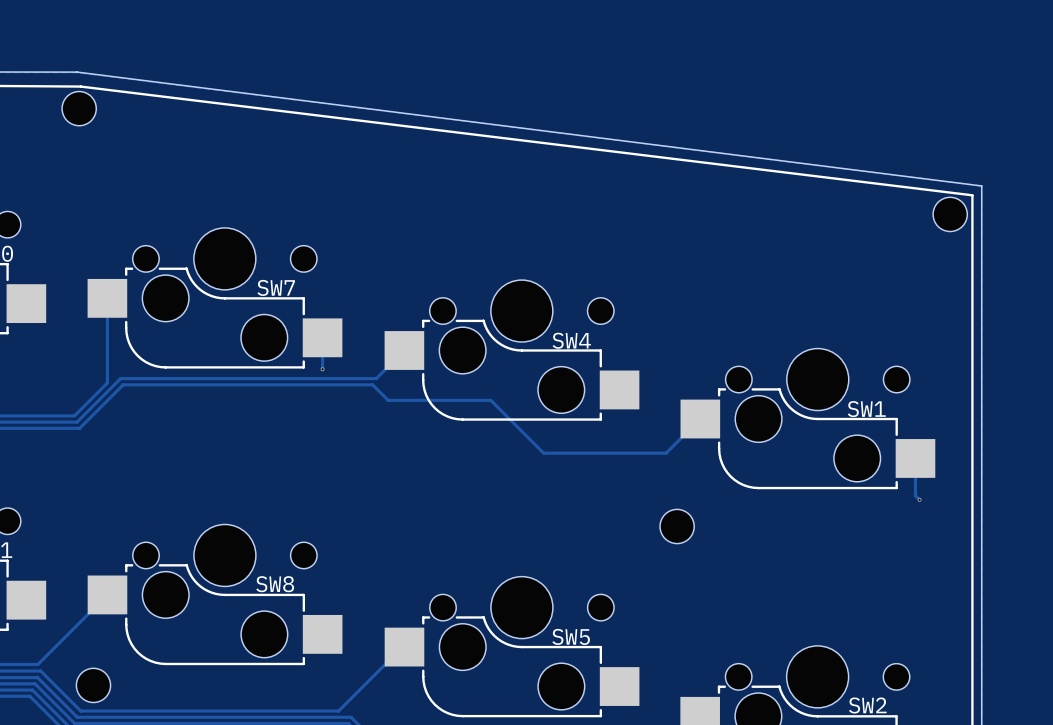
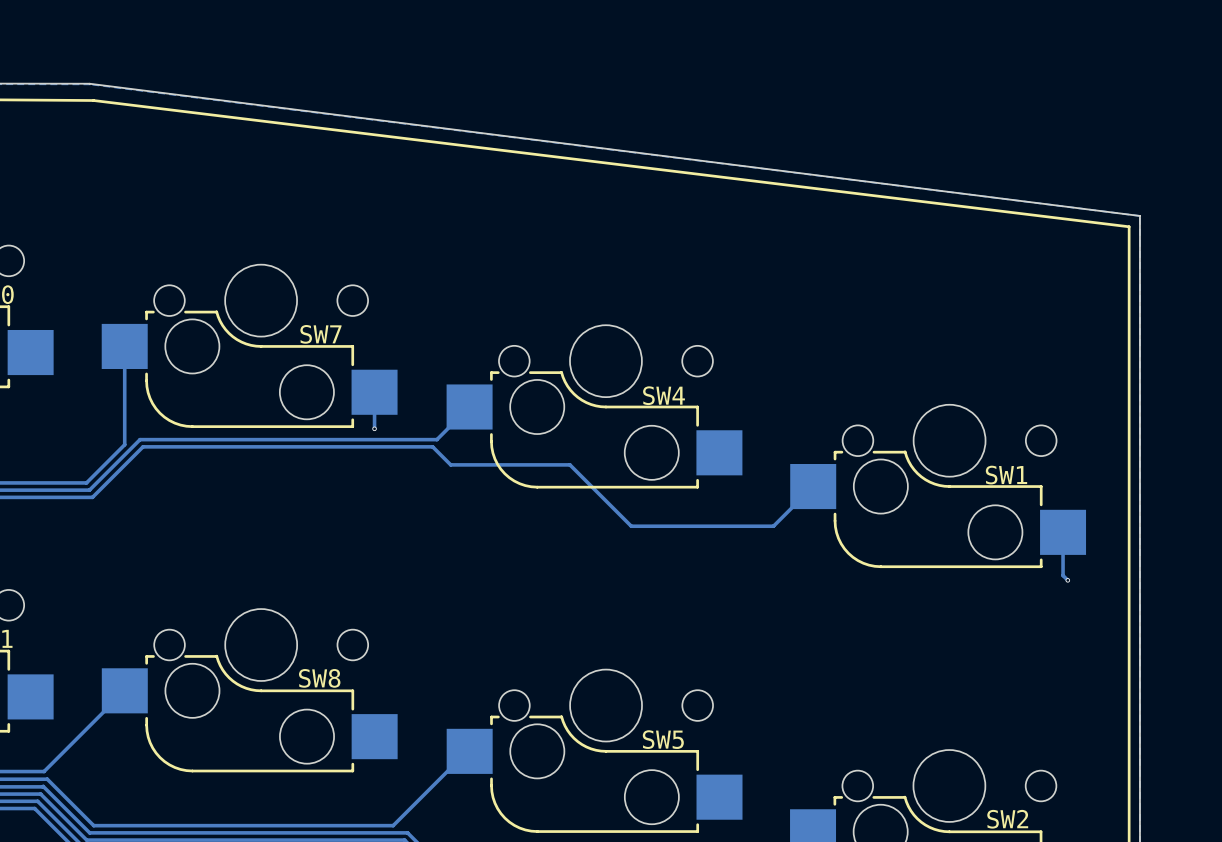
part: (79, 108) -> none
part: (950, 214) -> none
part: (677, 526) -> none
part: (93, 685) -> none

